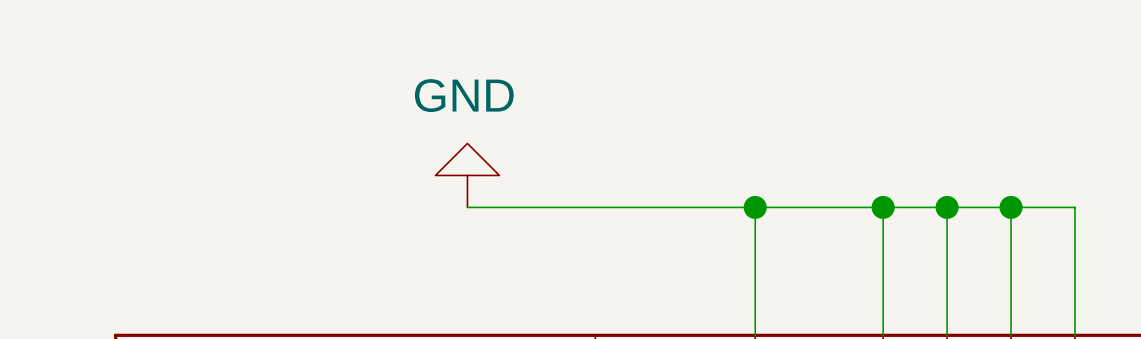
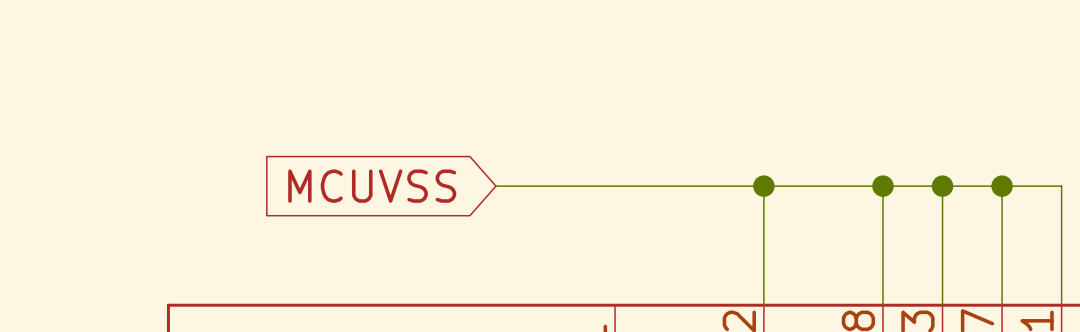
power symbol: GND (467, 175) -> none
global label: none -> MCUVSS (372, 186)

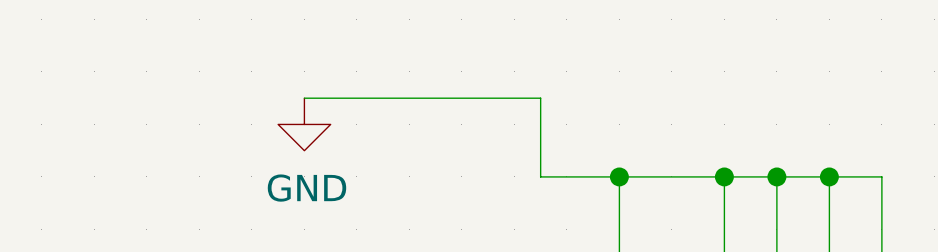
power symbol: none -> GND (304, 124)
global label: MCUVSS (372, 186) -> none
wire: (495, 186) (674, 186) -> (304, 98) (540, 98) (540, 176)

